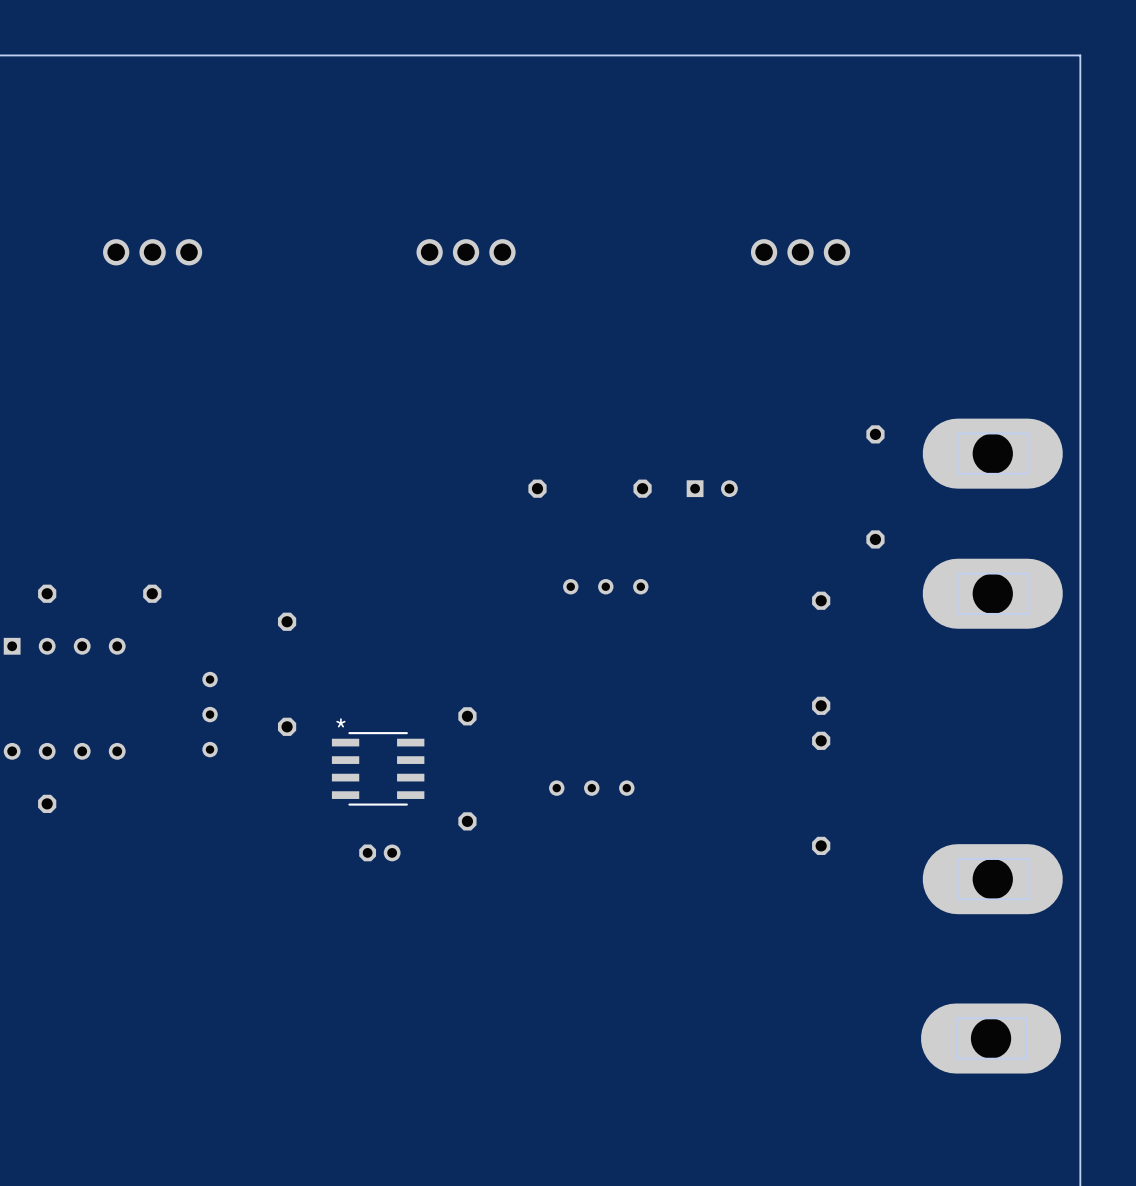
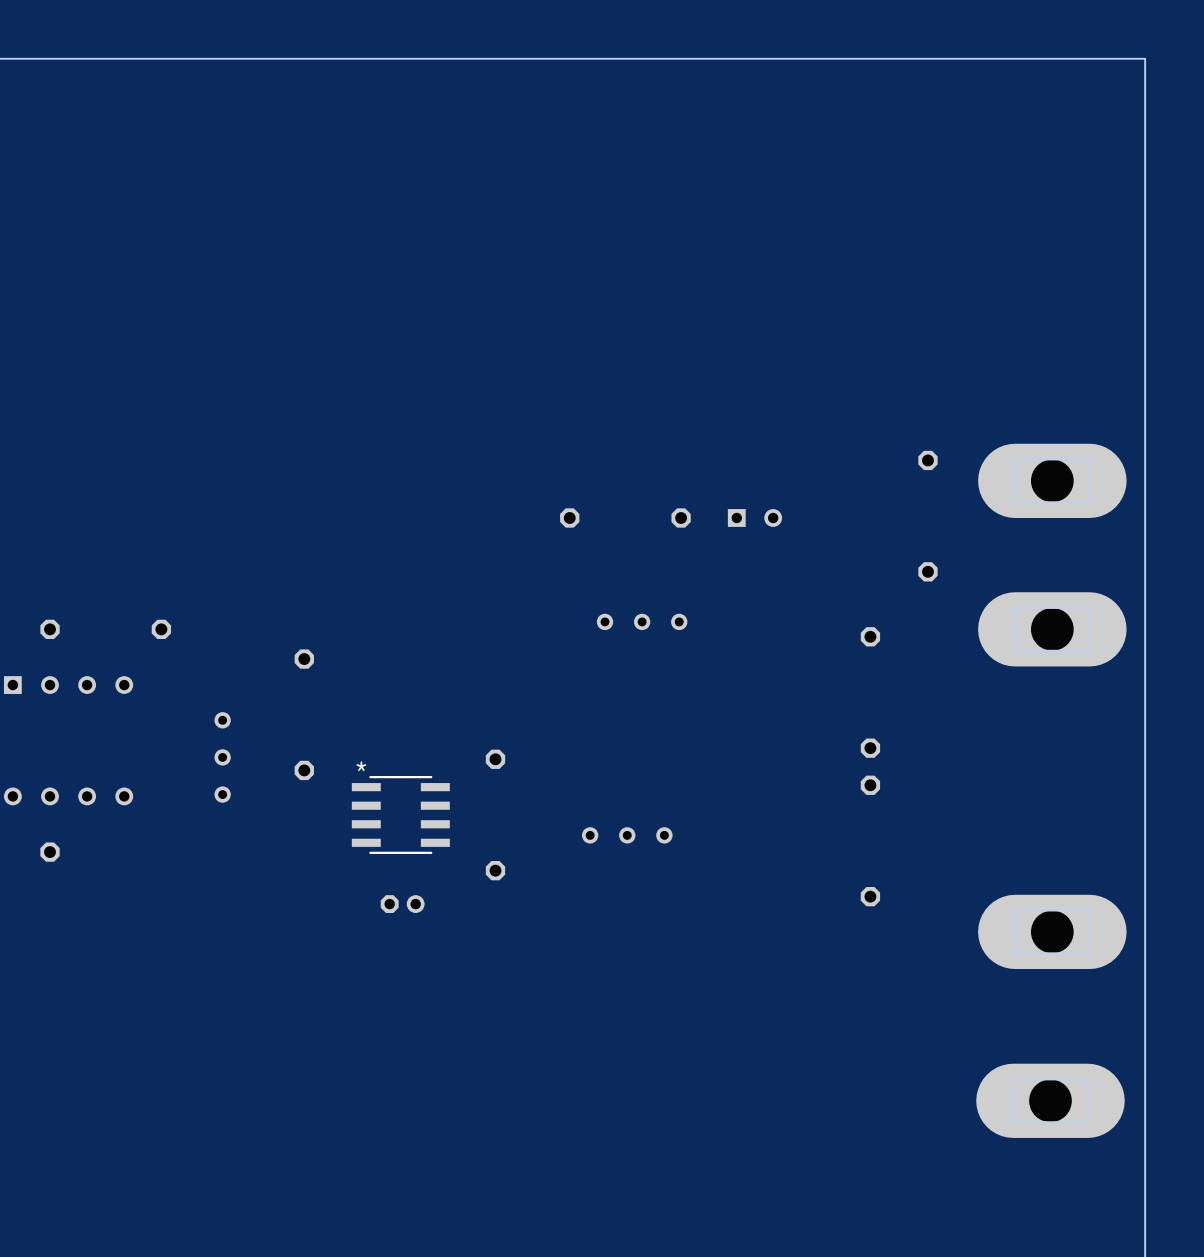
part: (152, 252) -> none
part: (466, 252) -> none
part: (800, 252) -> none

